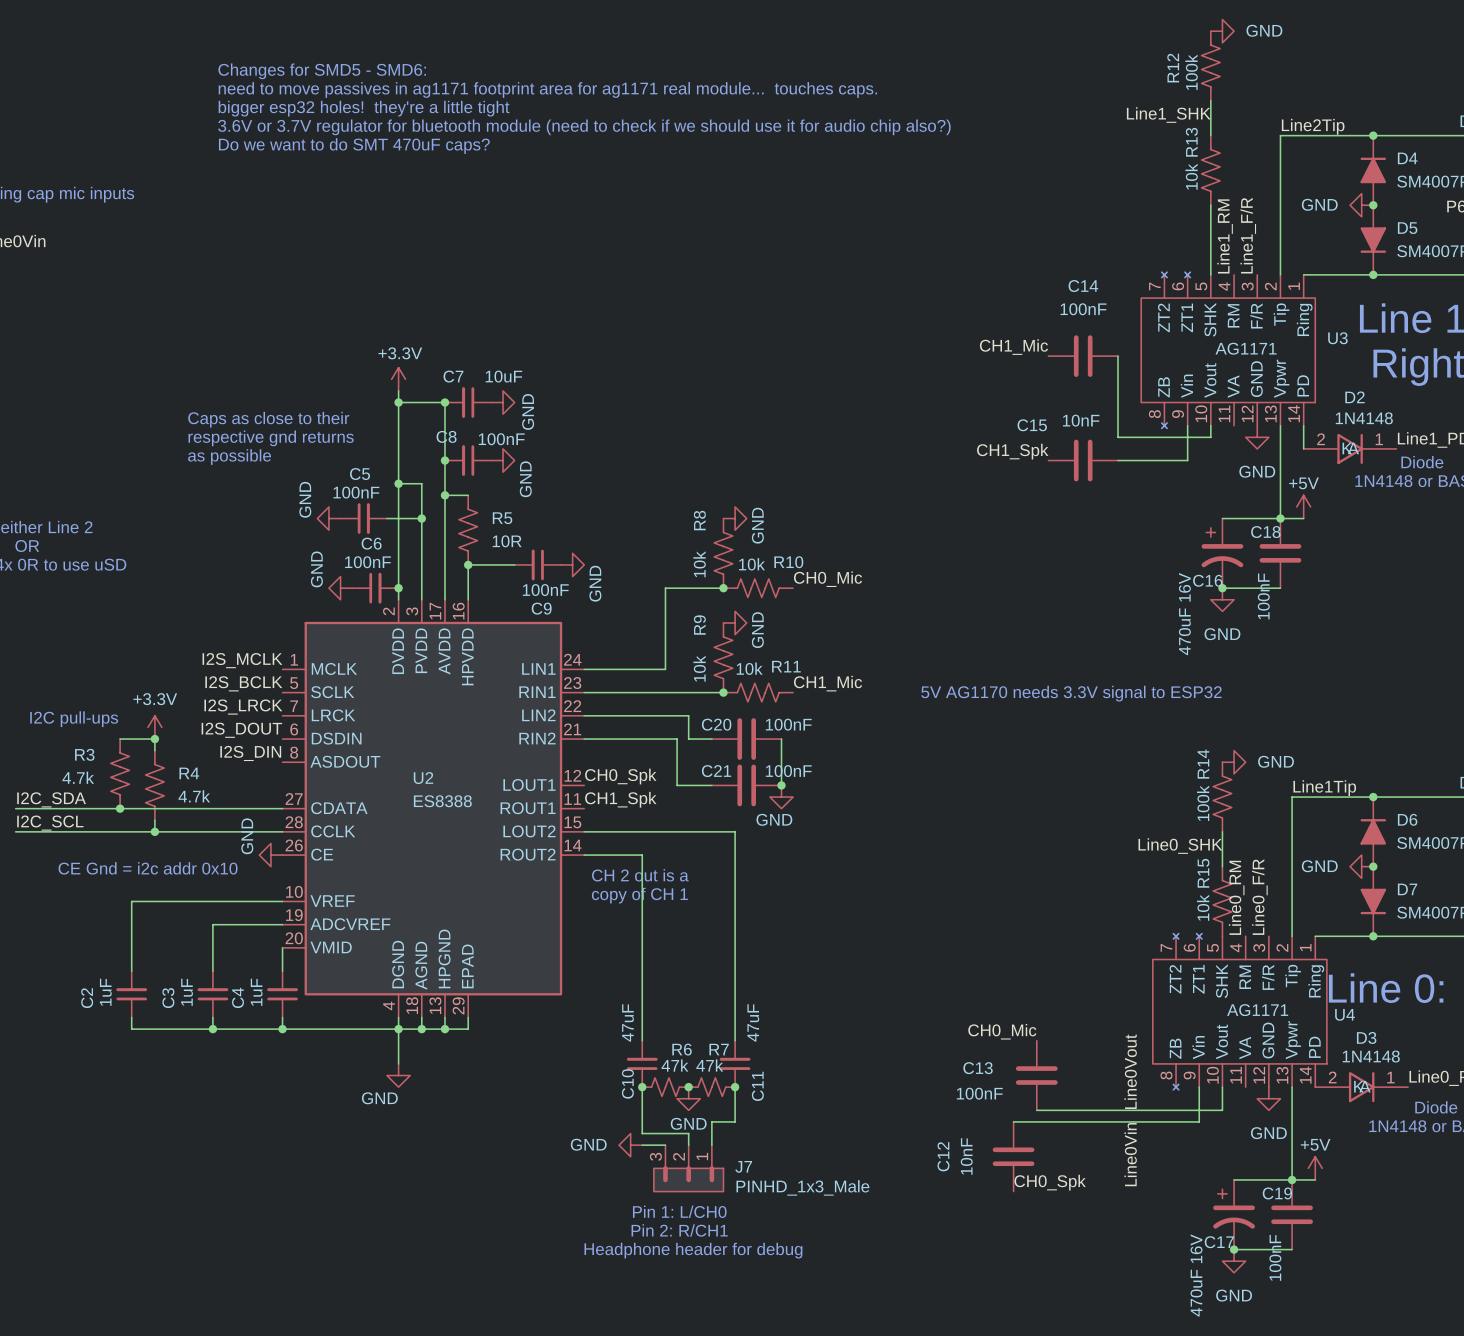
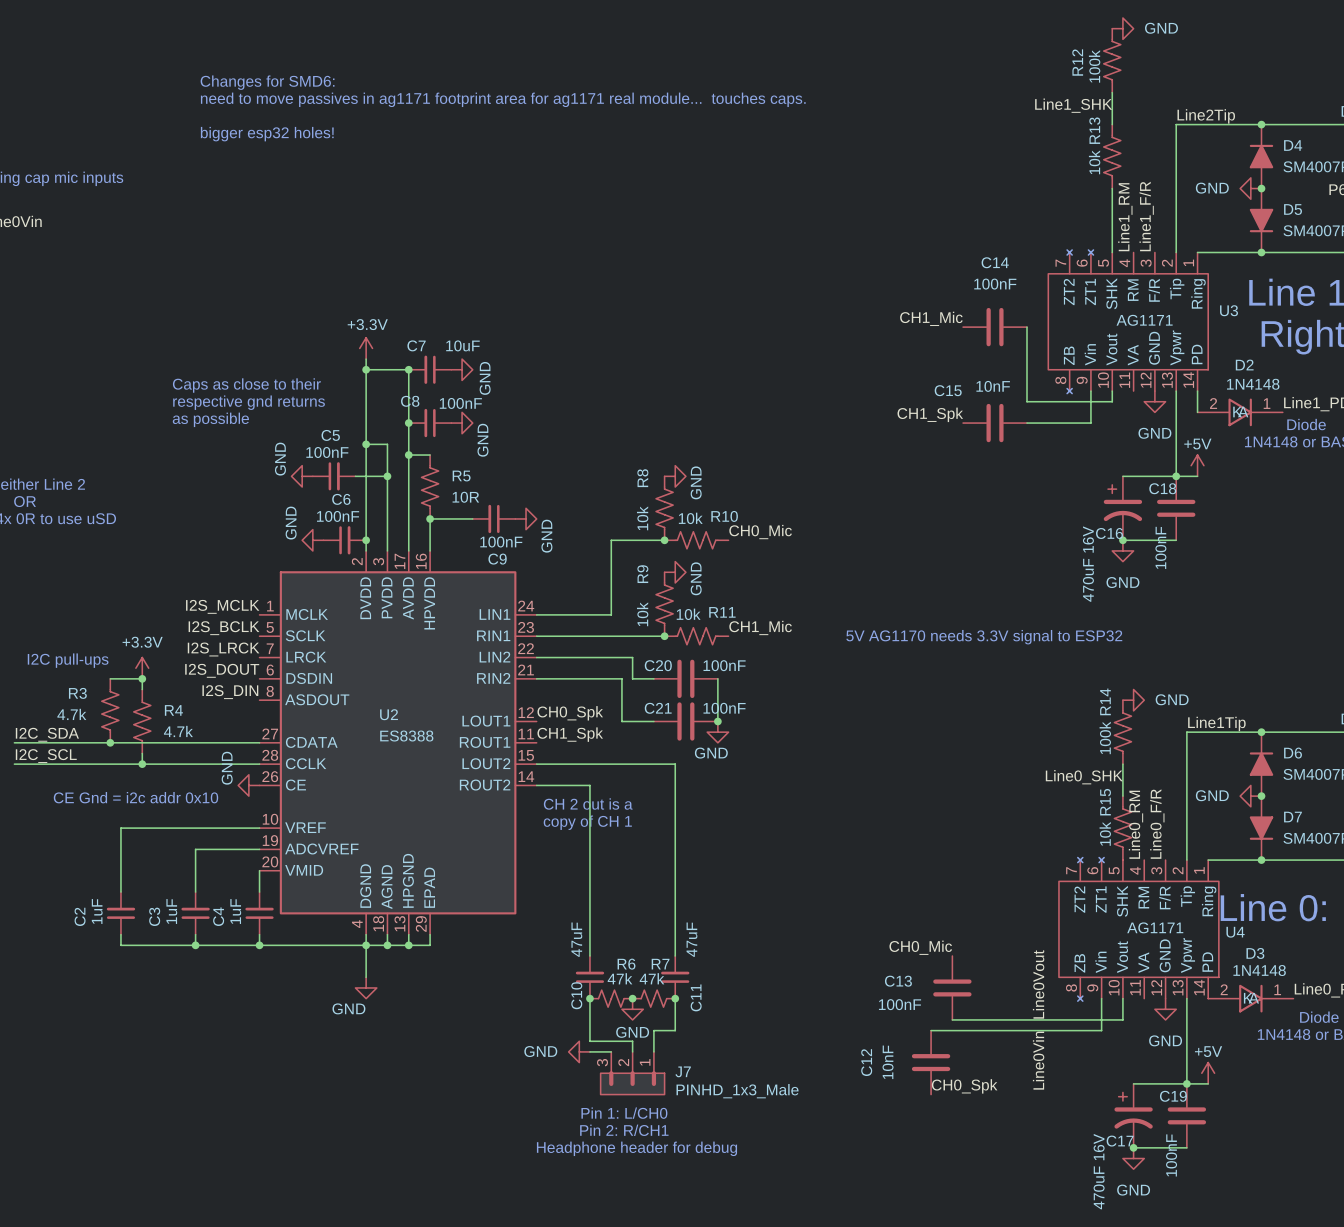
text: Changes for SMD5 - SMD6: (322, 71) -> none
text: need to move passives in ag1171 footprint area for ag1171 real module... touches caps. (547, 89) -> Changes for SMD6: (267, 82)
text: bigger esp32 holes! they're a little tight (364, 108) -> need to move passives in ag1171 footprint area for ag1171 real module... touches caps. (503, 99)
text: 3.6V or 3.7V regulator for bluetooth module (need to check if we should use it for audio chip also?) (584, 127) -> none
text: Do we want to do SMT 470uF caps? (354, 146) -> bigger esp32 holes! (267, 134)

